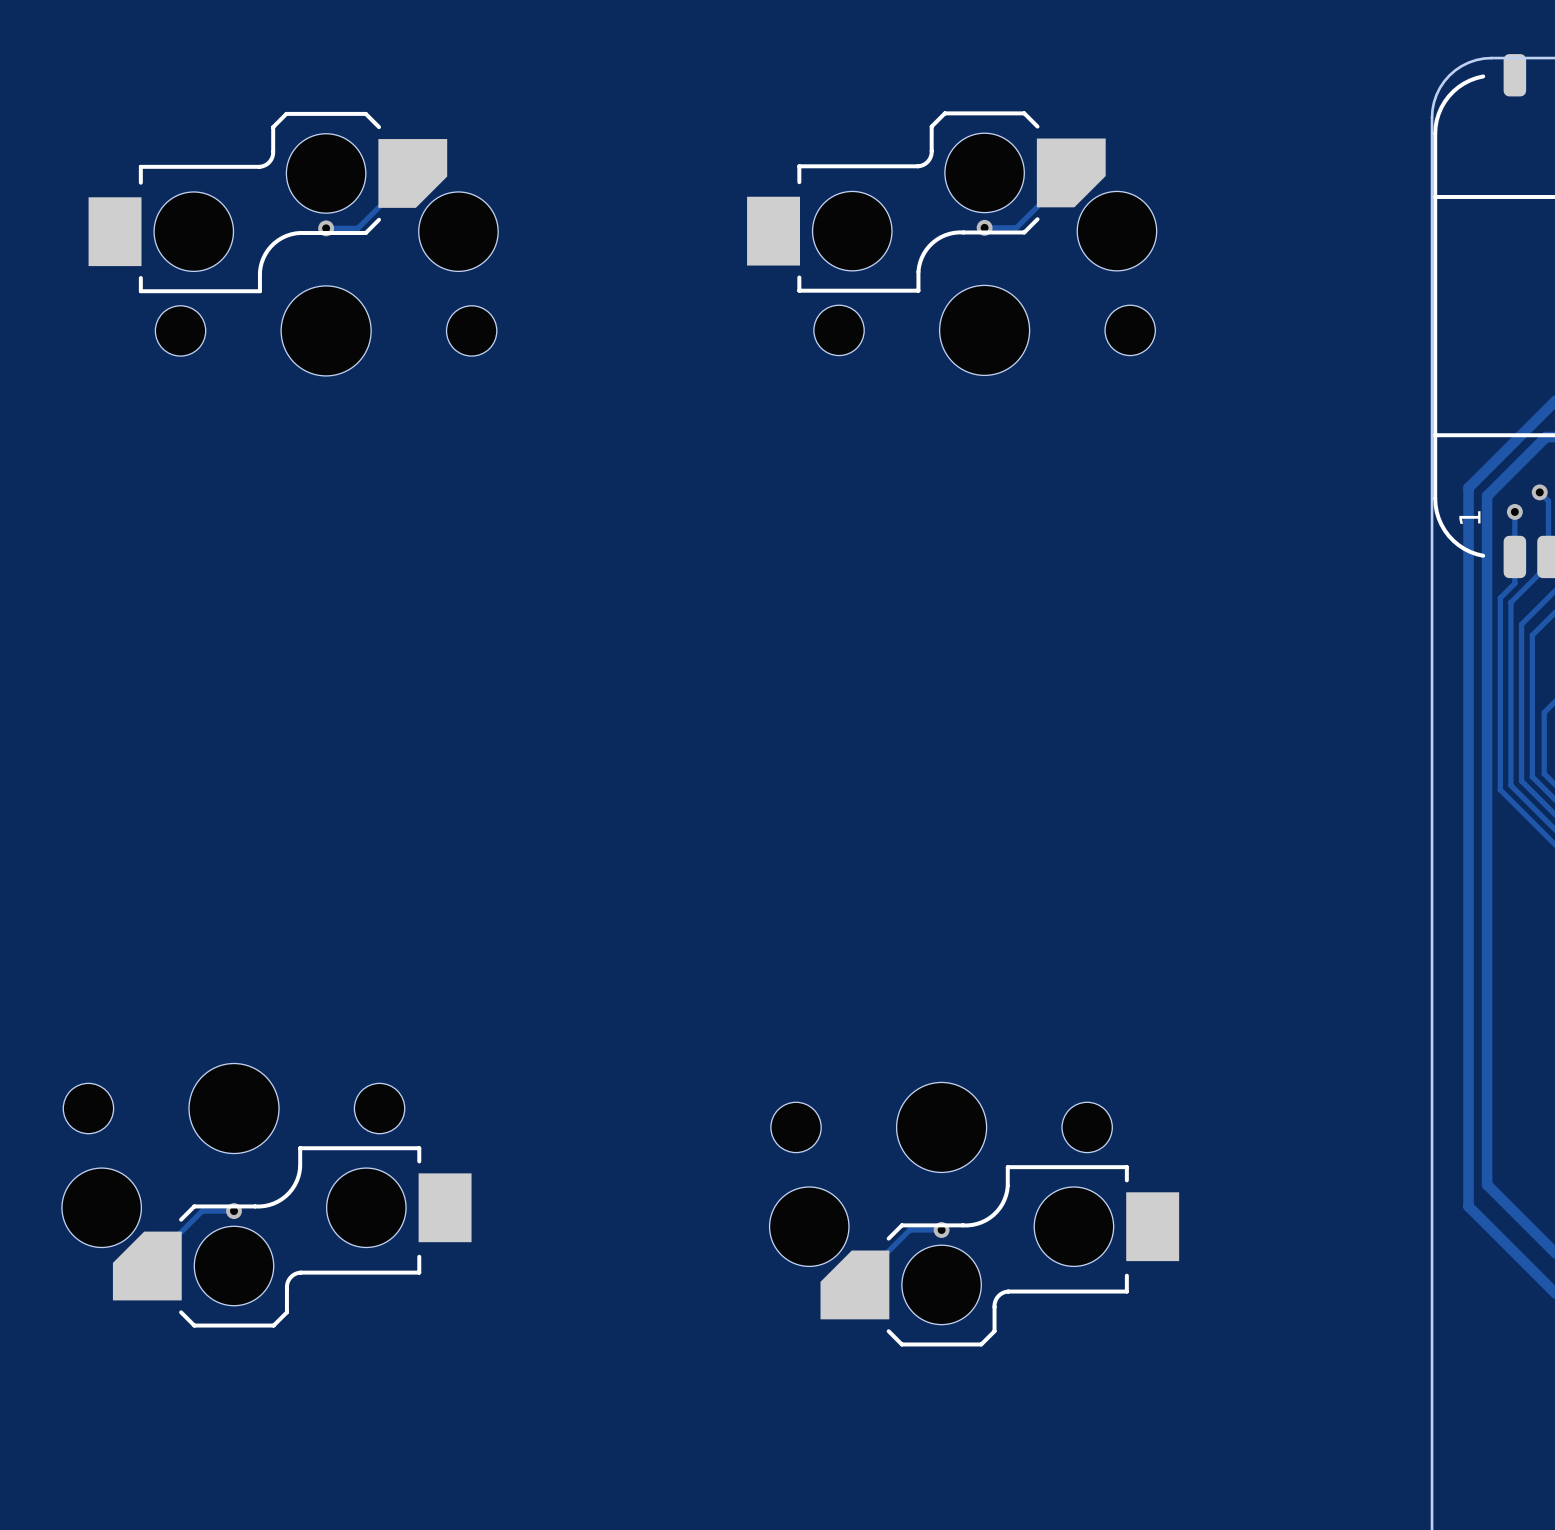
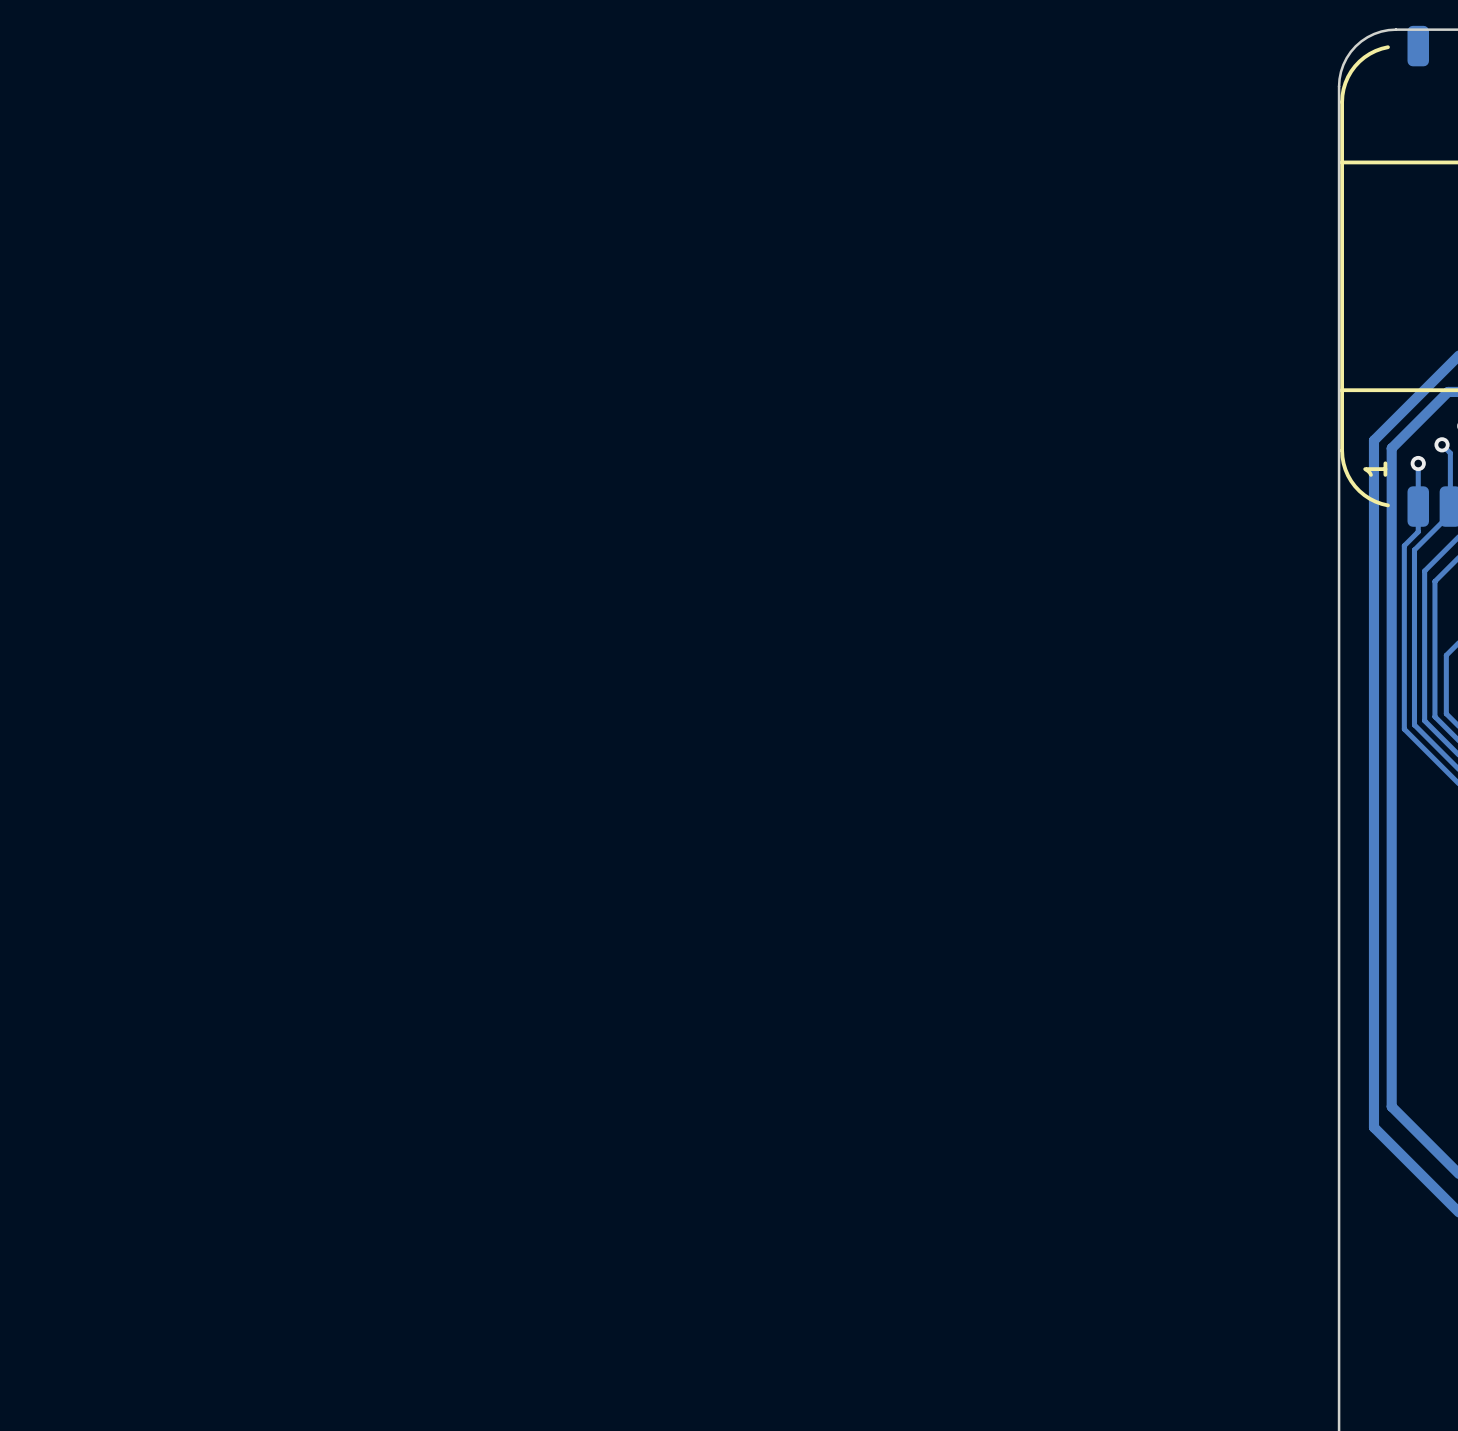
track: (1071, 172) (1016, 227) (984, 227) -> none
track: (412, 173) (357, 228) (326, 228) -> none
via: (984, 227) -> none
via: (326, 228) -> none
part: (293, 243) -> none
part: (951, 243) -> none
part: (266, 1195) -> none
track: (234, 1211) (202, 1211) (147, 1266) -> none
via: (234, 1211) -> none
part: (974, 1214) -> none
track: (941, 1230) (909, 1230) (854, 1284) -> none
via: (941, 1230) -> none

